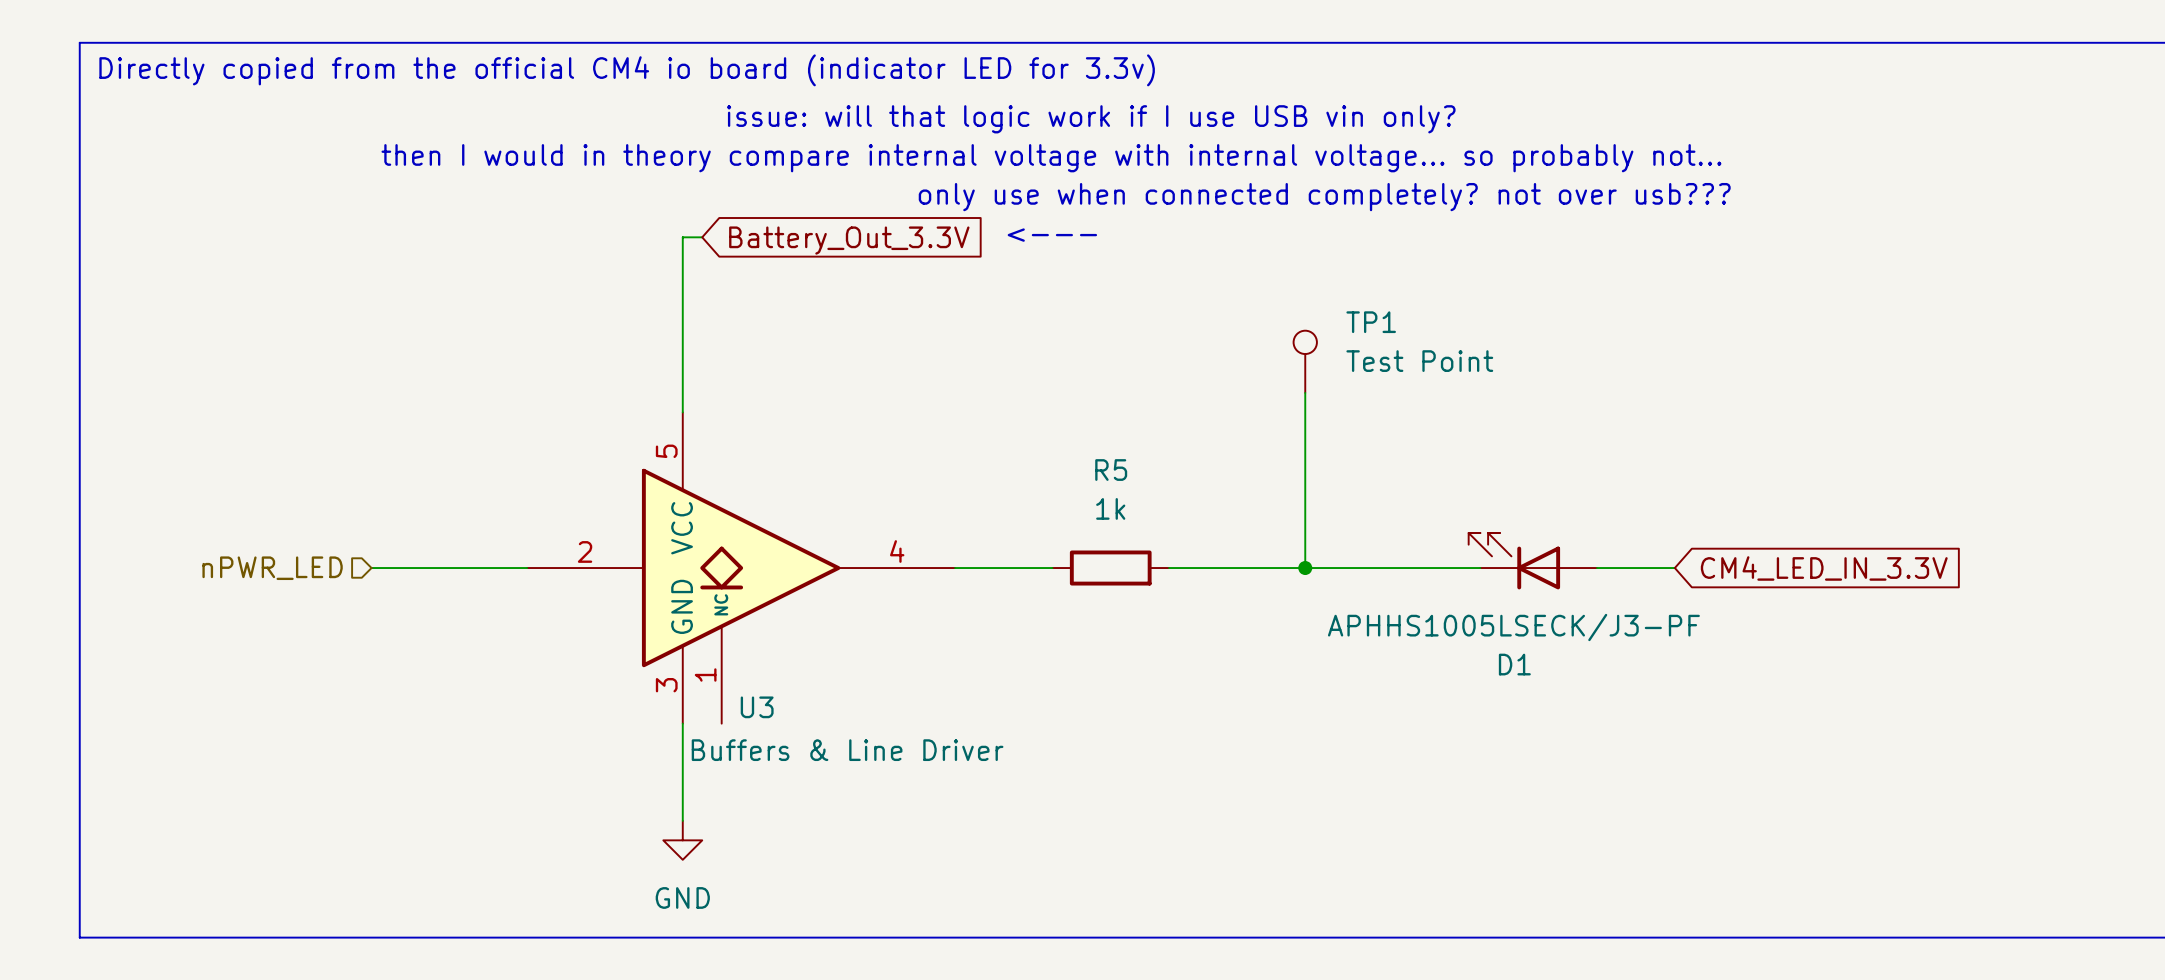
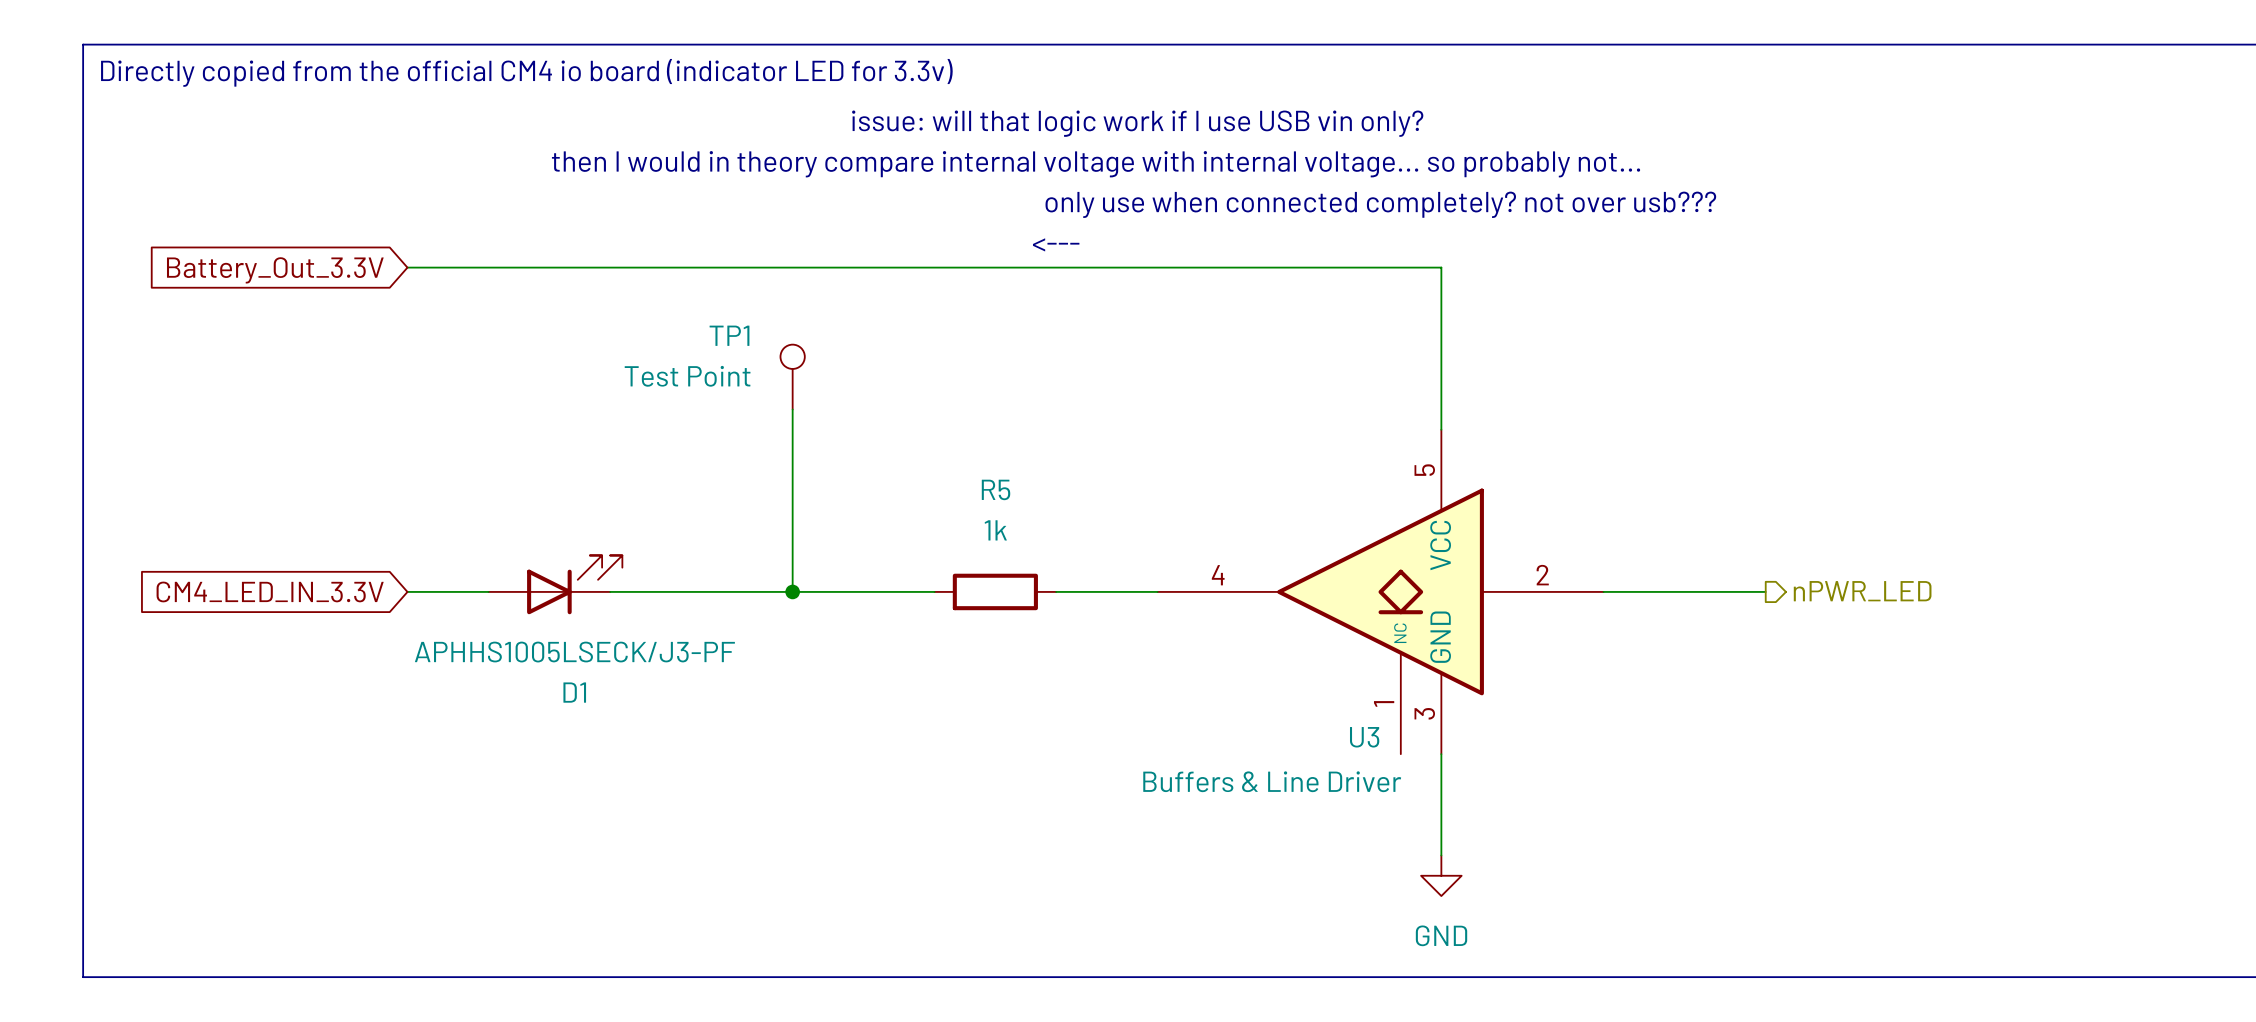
text position: <--- (1052, 235) -> <--- (1056, 244)
wire: (702, 237) (682, 237) (682, 412) -> none
global label rotation: 0° (849, 240) -> 180° (275, 270)
global label position: Battery_Out_3.3V (849, 240) -> Battery_Out_3.3V (275, 270)
wire: none -> (407, 267) (1441, 267) (1441, 429)
TP1 name position: TP1 (1371, 322) -> TP1 (729, 335)
TP1 position: (1305, 361) -> (792, 377)
TP1 value position: Test Point (1419, 361) -> Test Point (687, 376)
wire: none -> (792, 409) (792, 591)
wire: (1305, 392) (1305, 568) -> none
D1 flip: as is (1514, 561) -> left-right (574, 584)
D1 position: (1532, 561) -> (555, 584)
global label: none -> CM4_LED_IN_3.3V (270, 591)
hierarchical label: nPWR_LED (272, 568) -> none
wire: (371, 568) (390, 568) -> none
U3 flip: as is (741, 568) -> left-right (1380, 591)
U3 position: (741, 568) -> (1380, 591)
junction: none -> (792, 591)
wire: (955, 568) (1013, 568) -> (1096, 591) (1157, 591)
R5 position: (1110, 568) -> (995, 591)
junction: (1305, 568) -> none
wire: none -> (1745, 591) (1765, 591)
hierarchical label: none -> nPWR_LED (1862, 591)
global label: CM4_LED_IN_3.3V (1824, 568) -> none
wire: (682, 723) (682, 820) -> none
wire: none -> (1441, 754) (1441, 855)
power symbol: GND (682, 840) -> none
power symbol: none -> GND (1441, 875)

